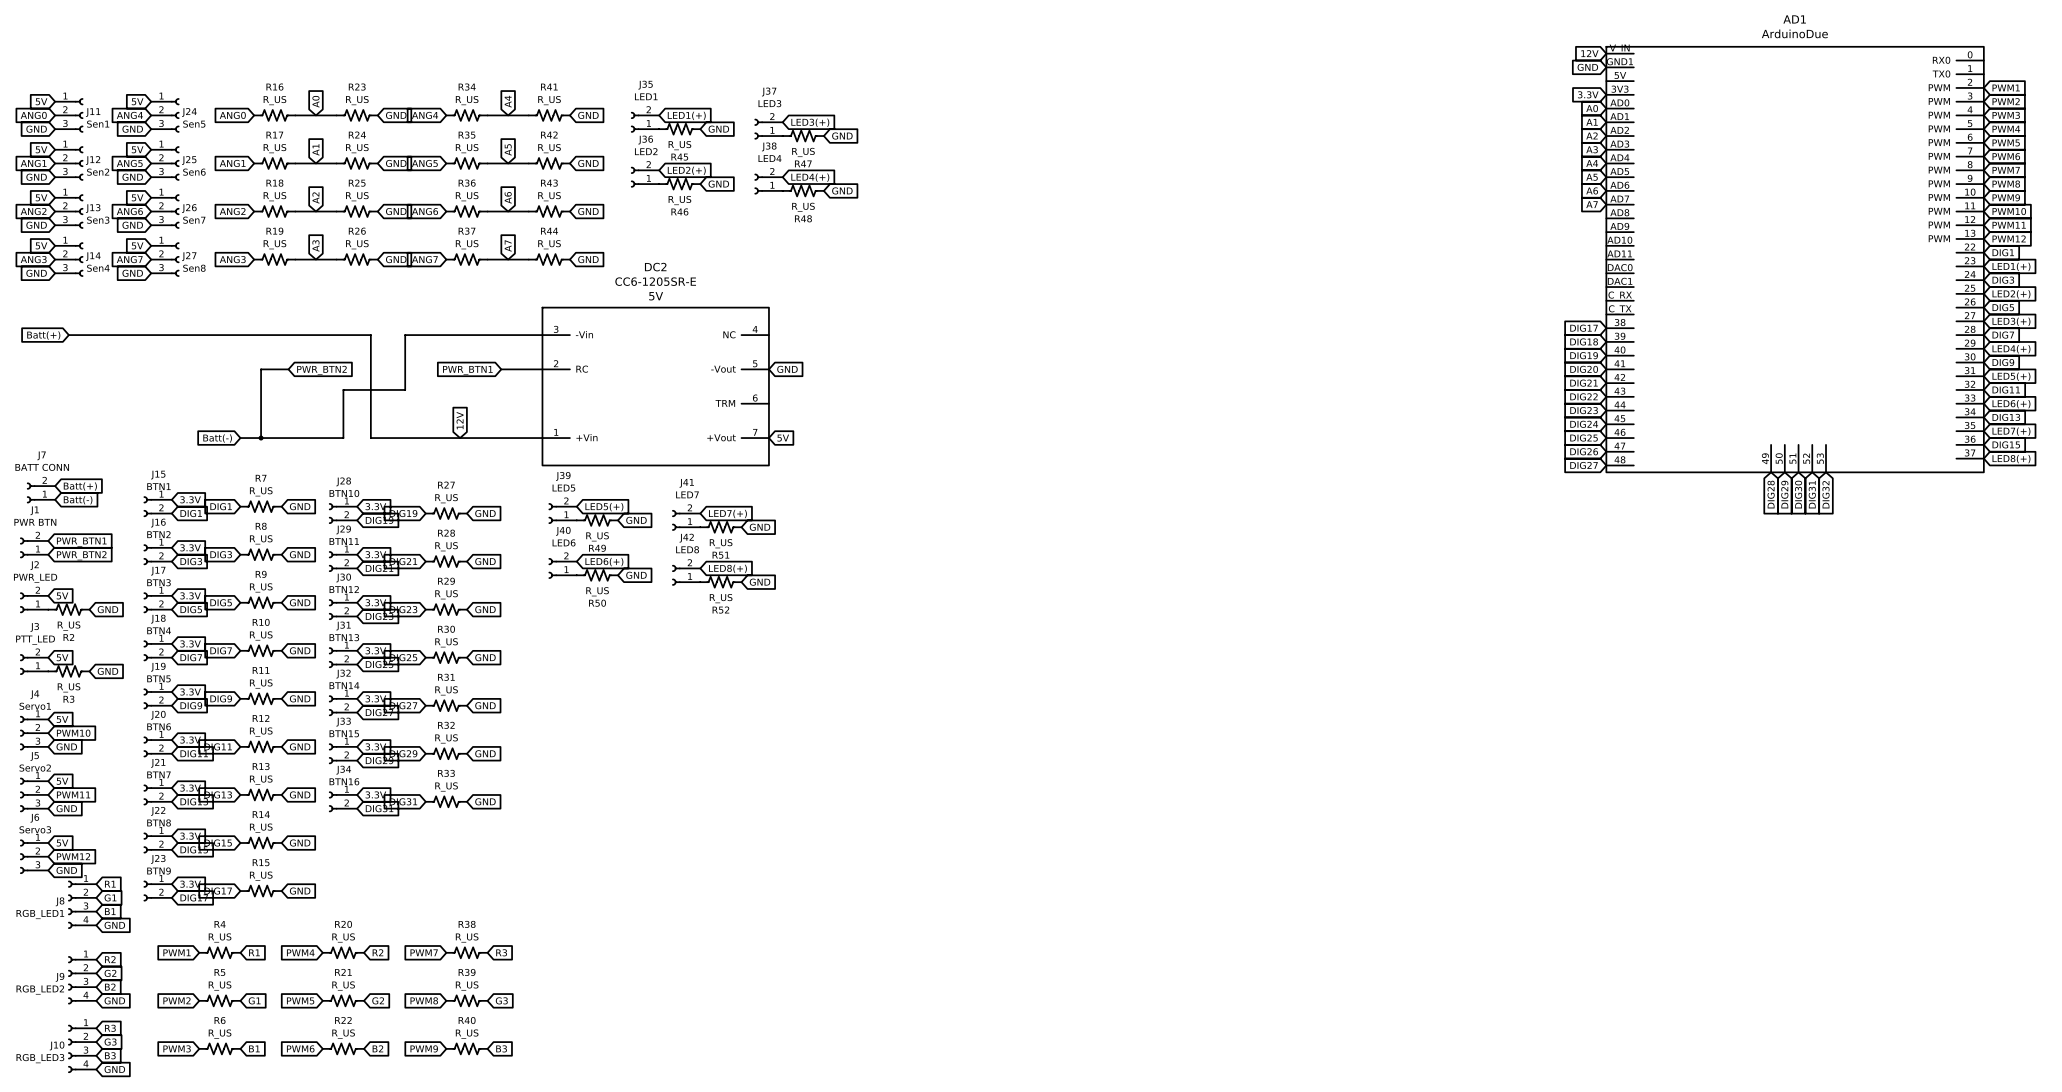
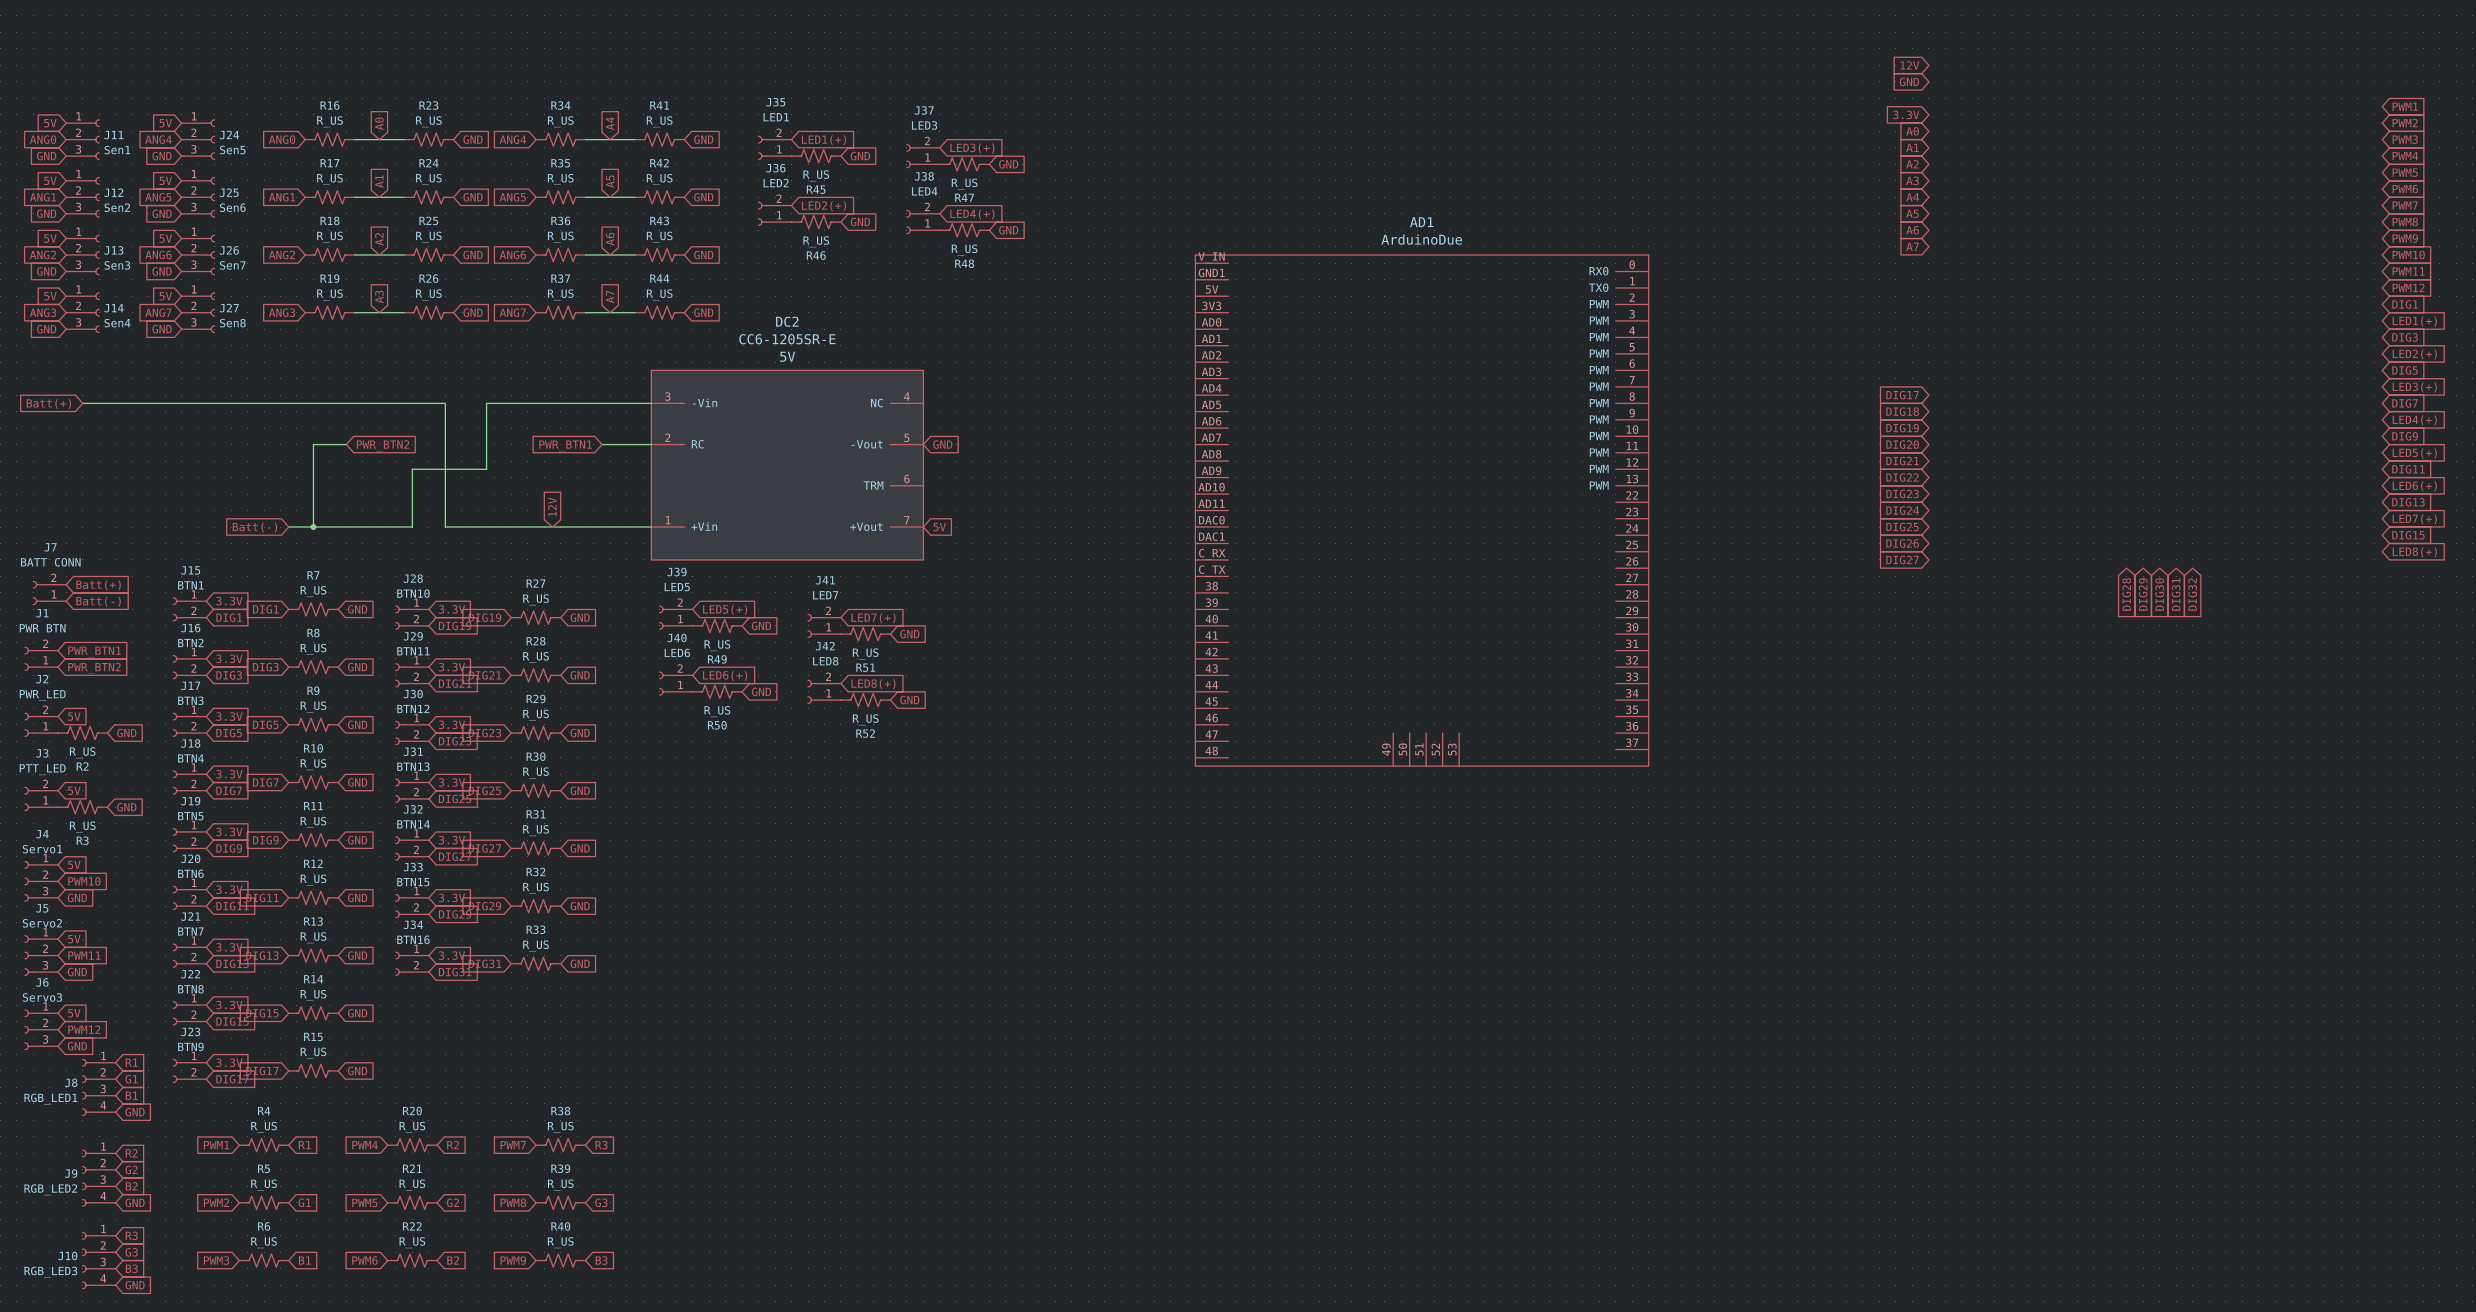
AD1 position: (1795, 259) -> (1422, 510)

